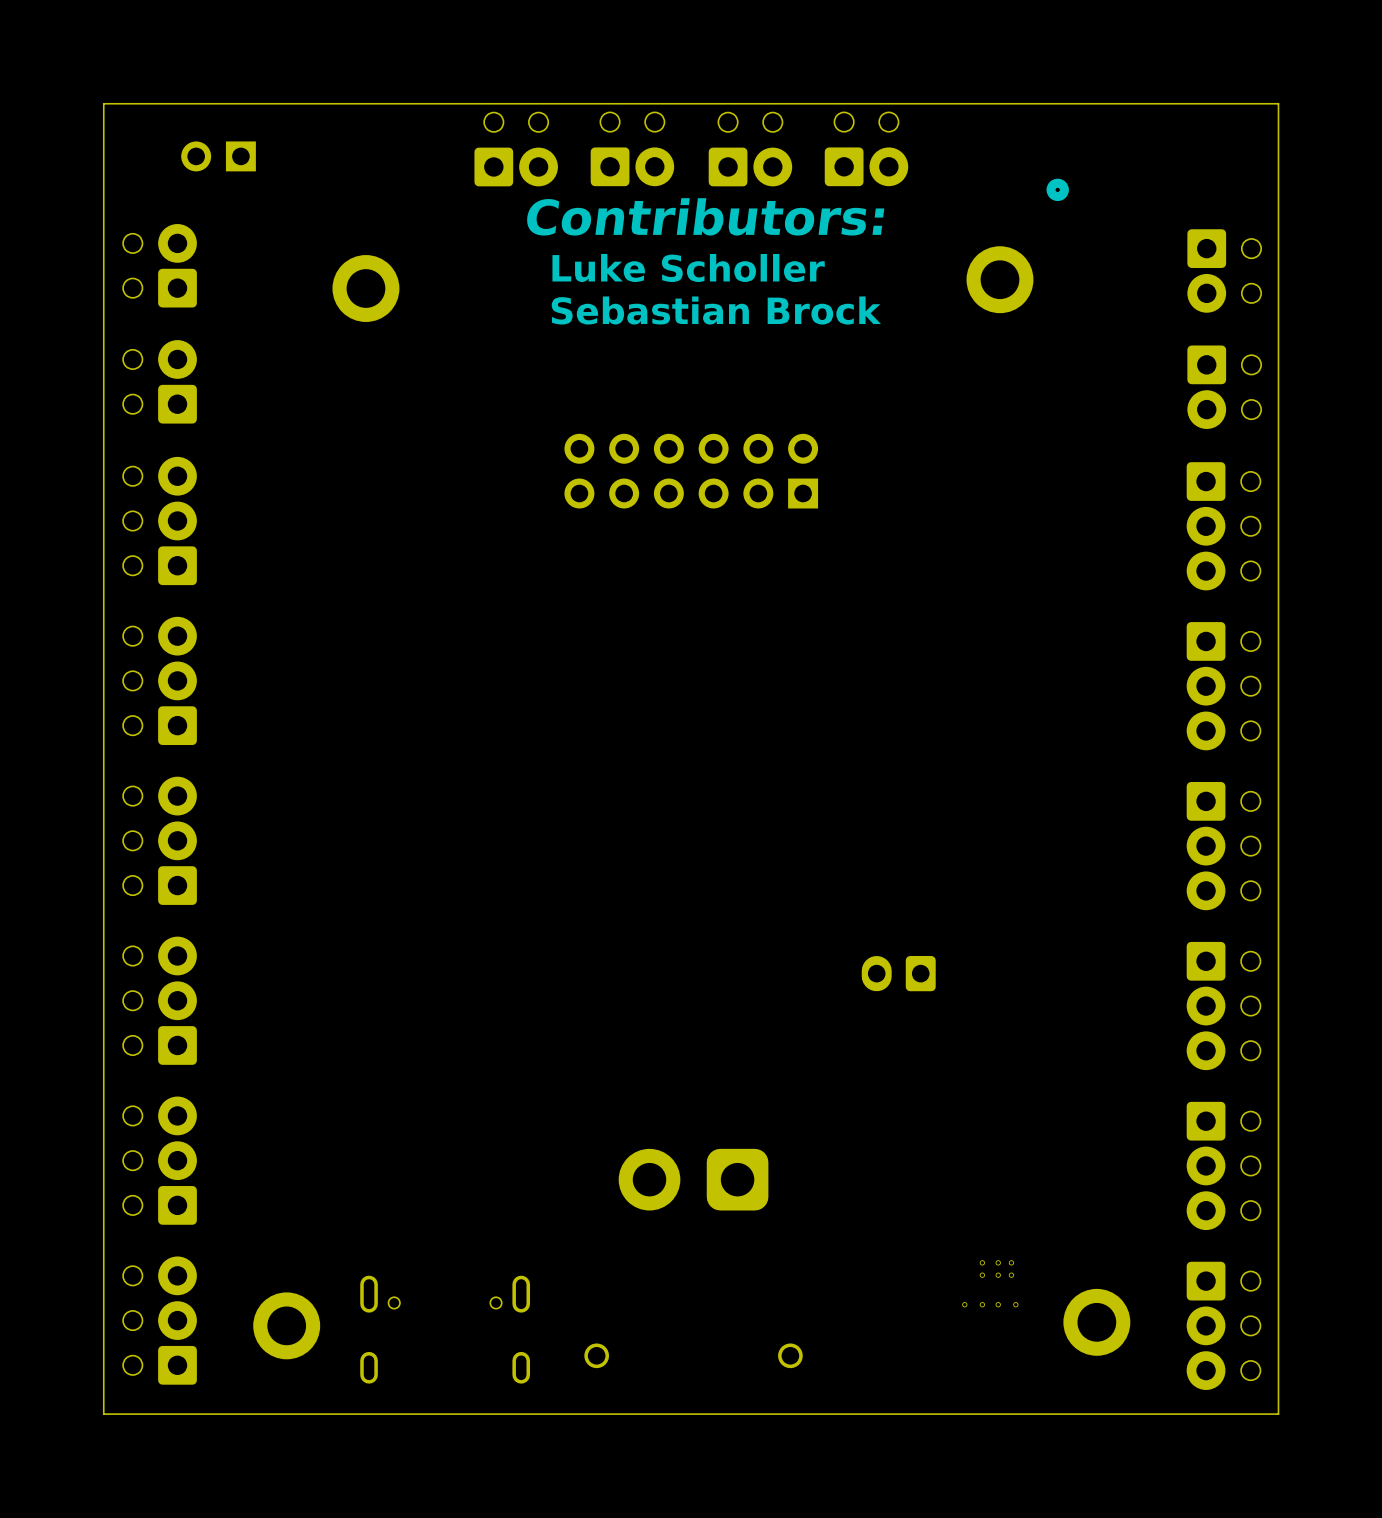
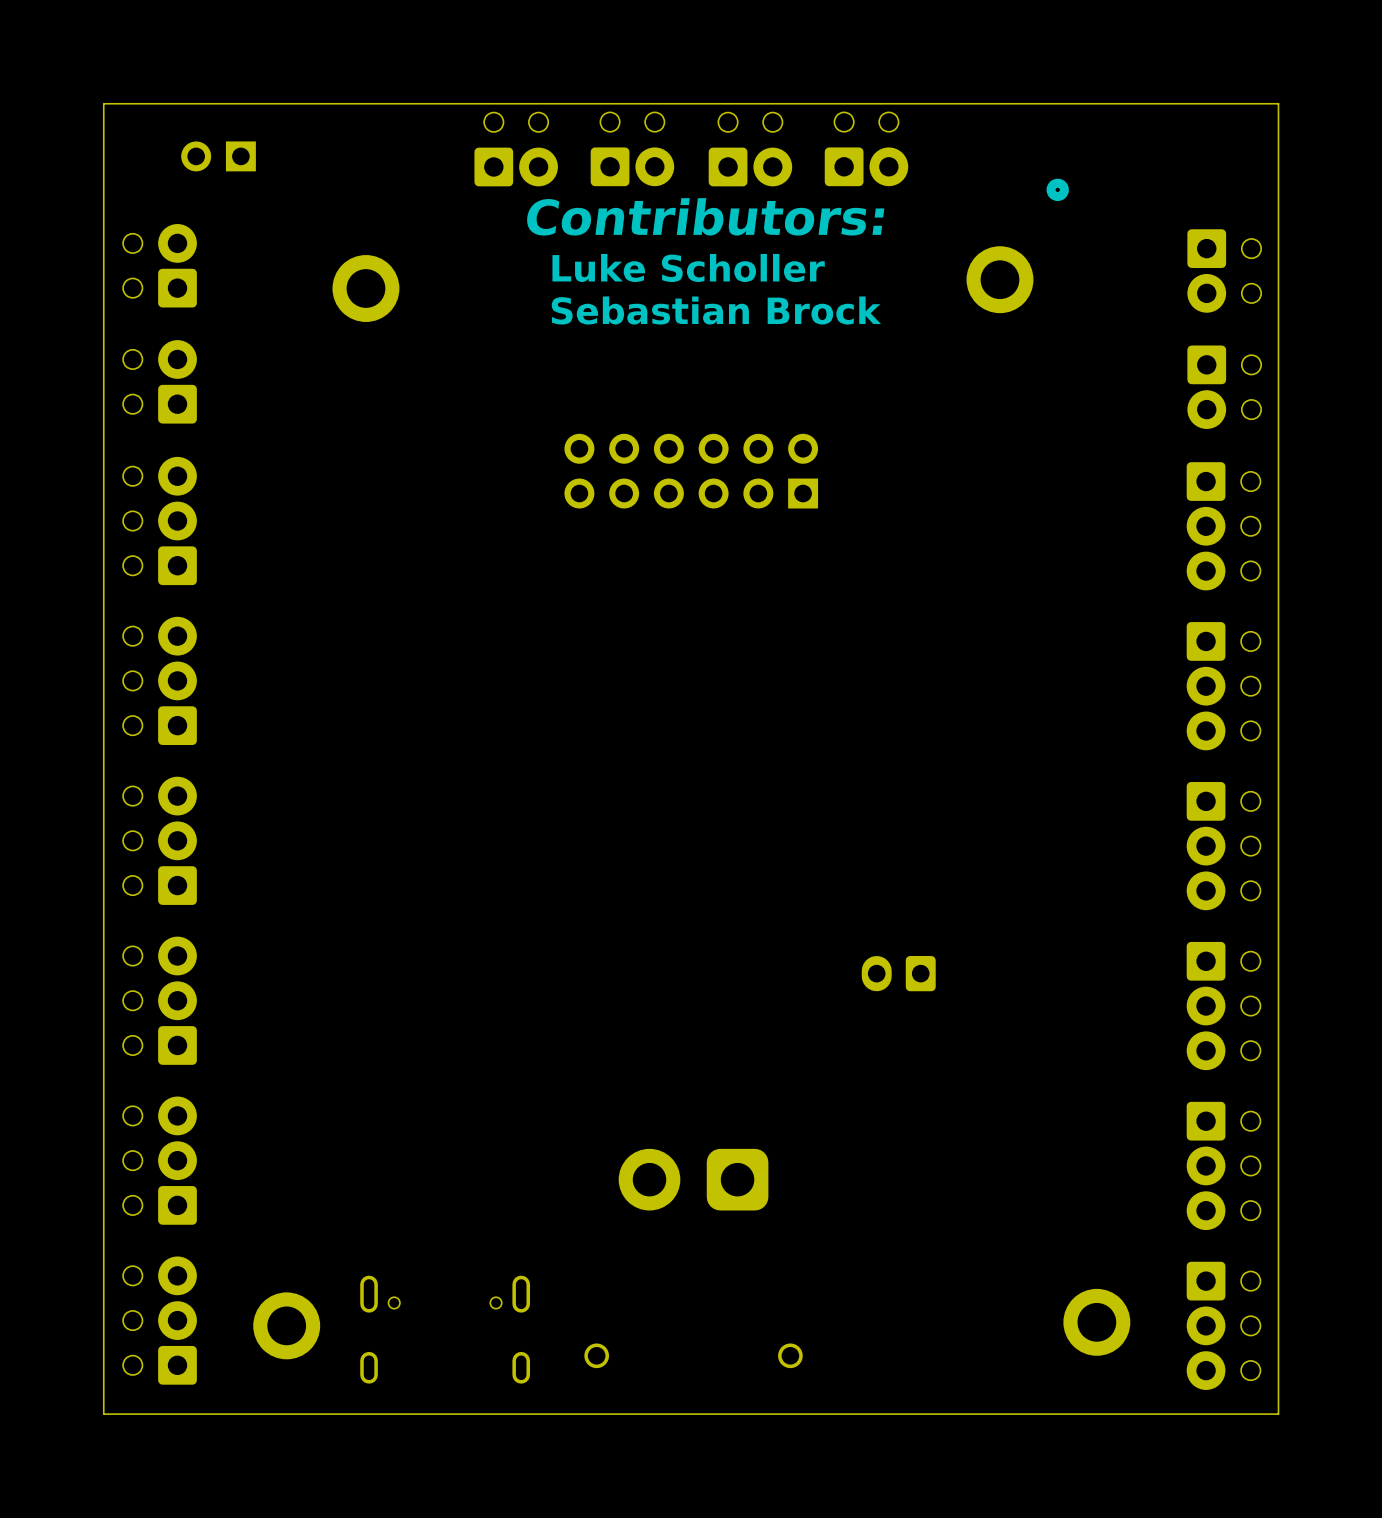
part: (990, 1283) -> none

